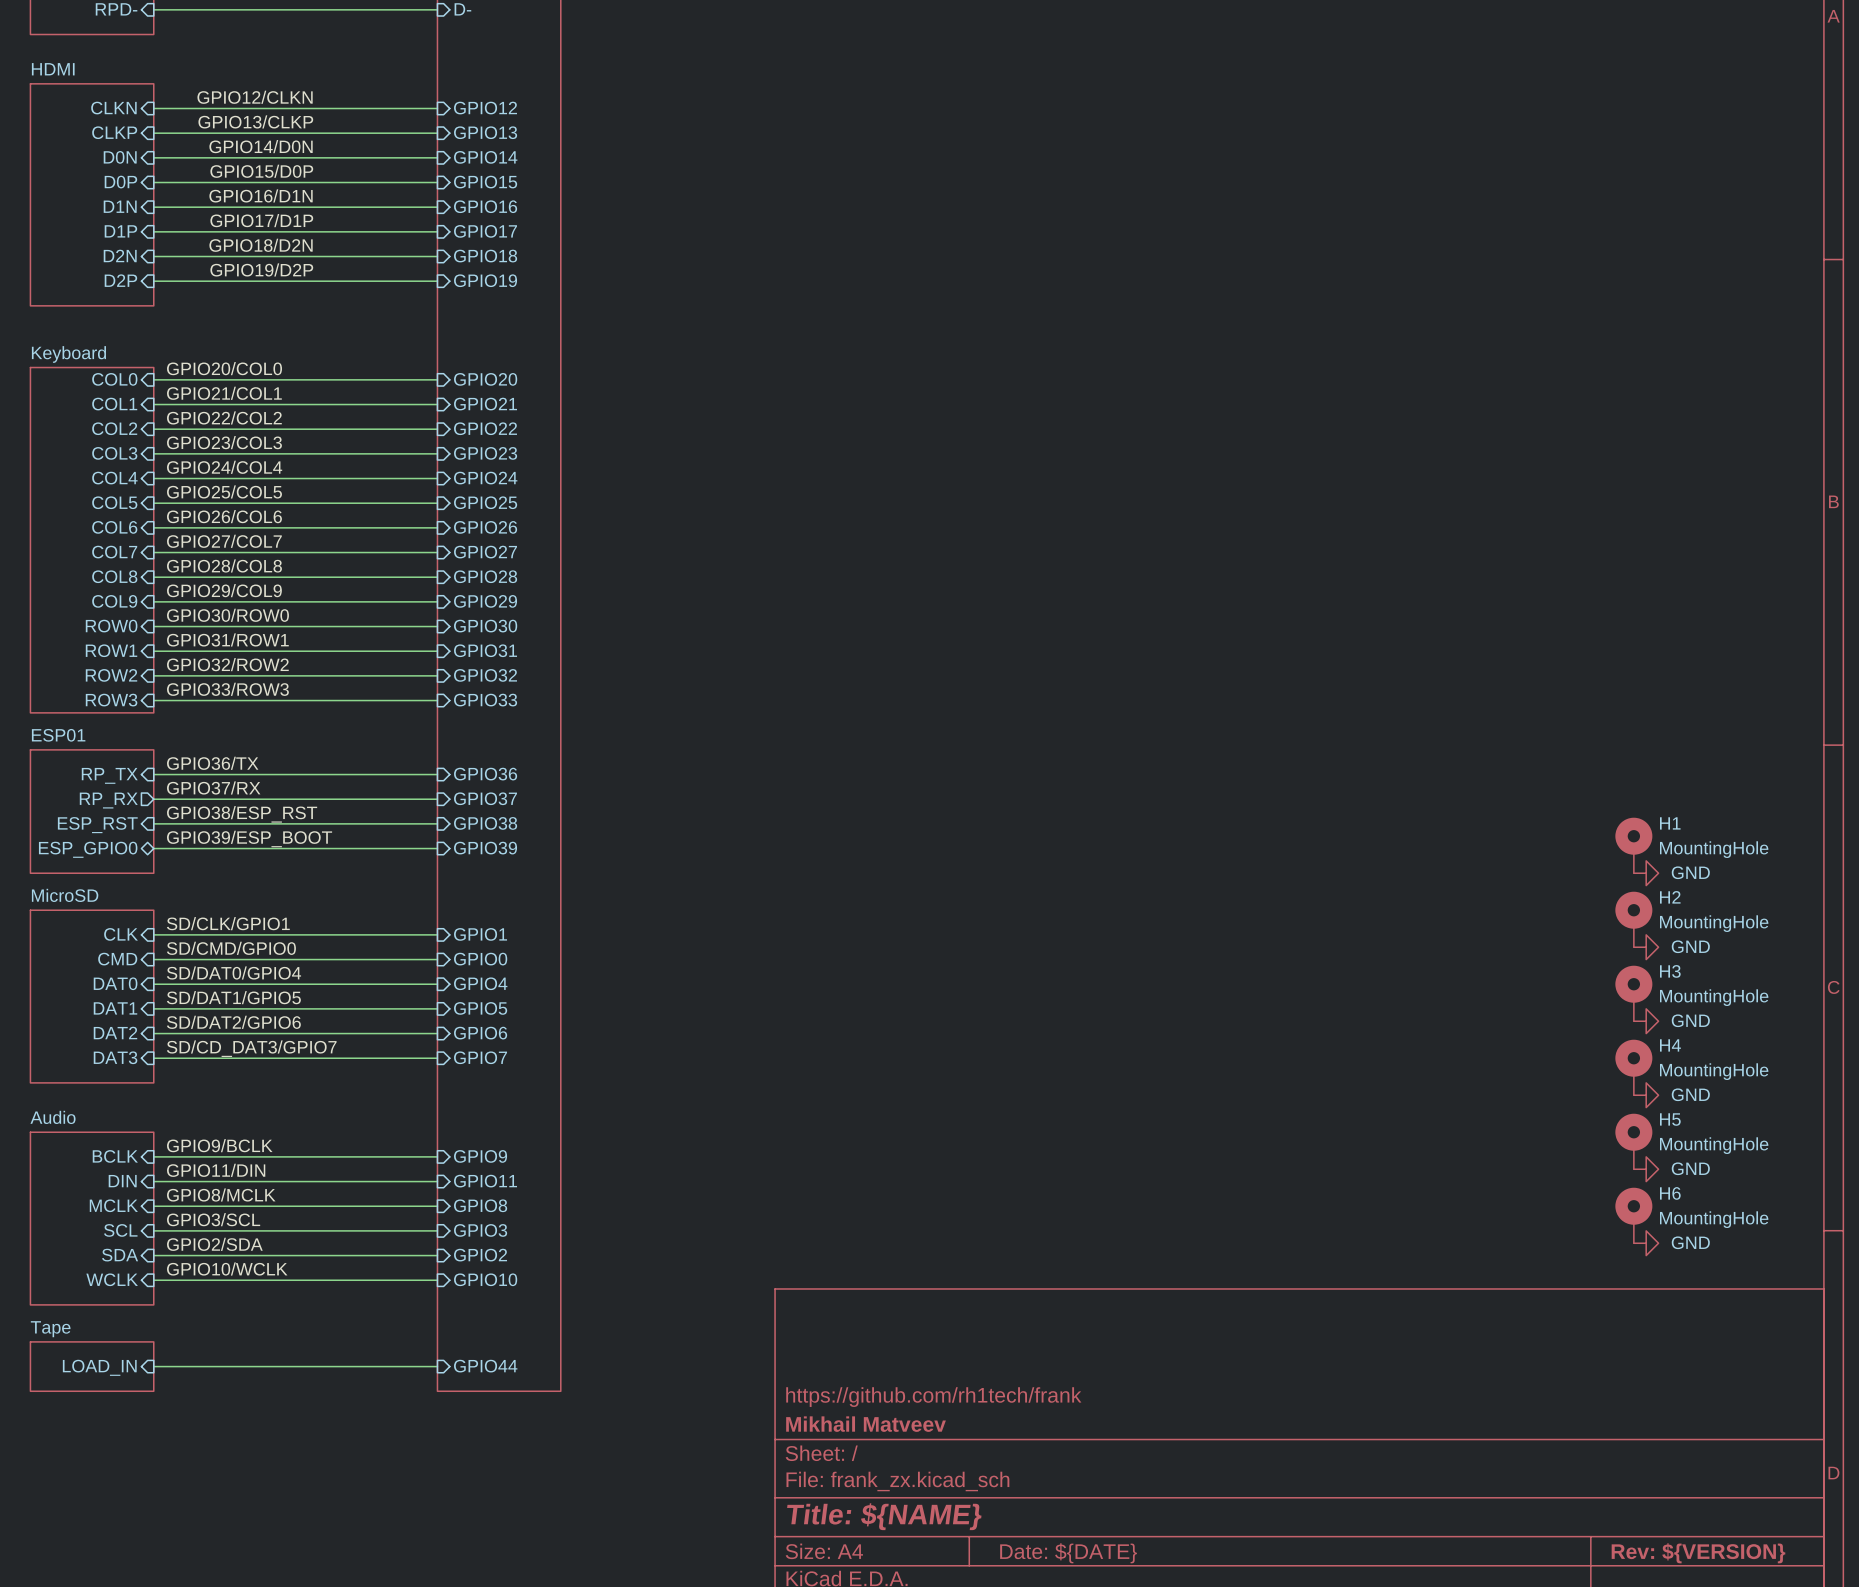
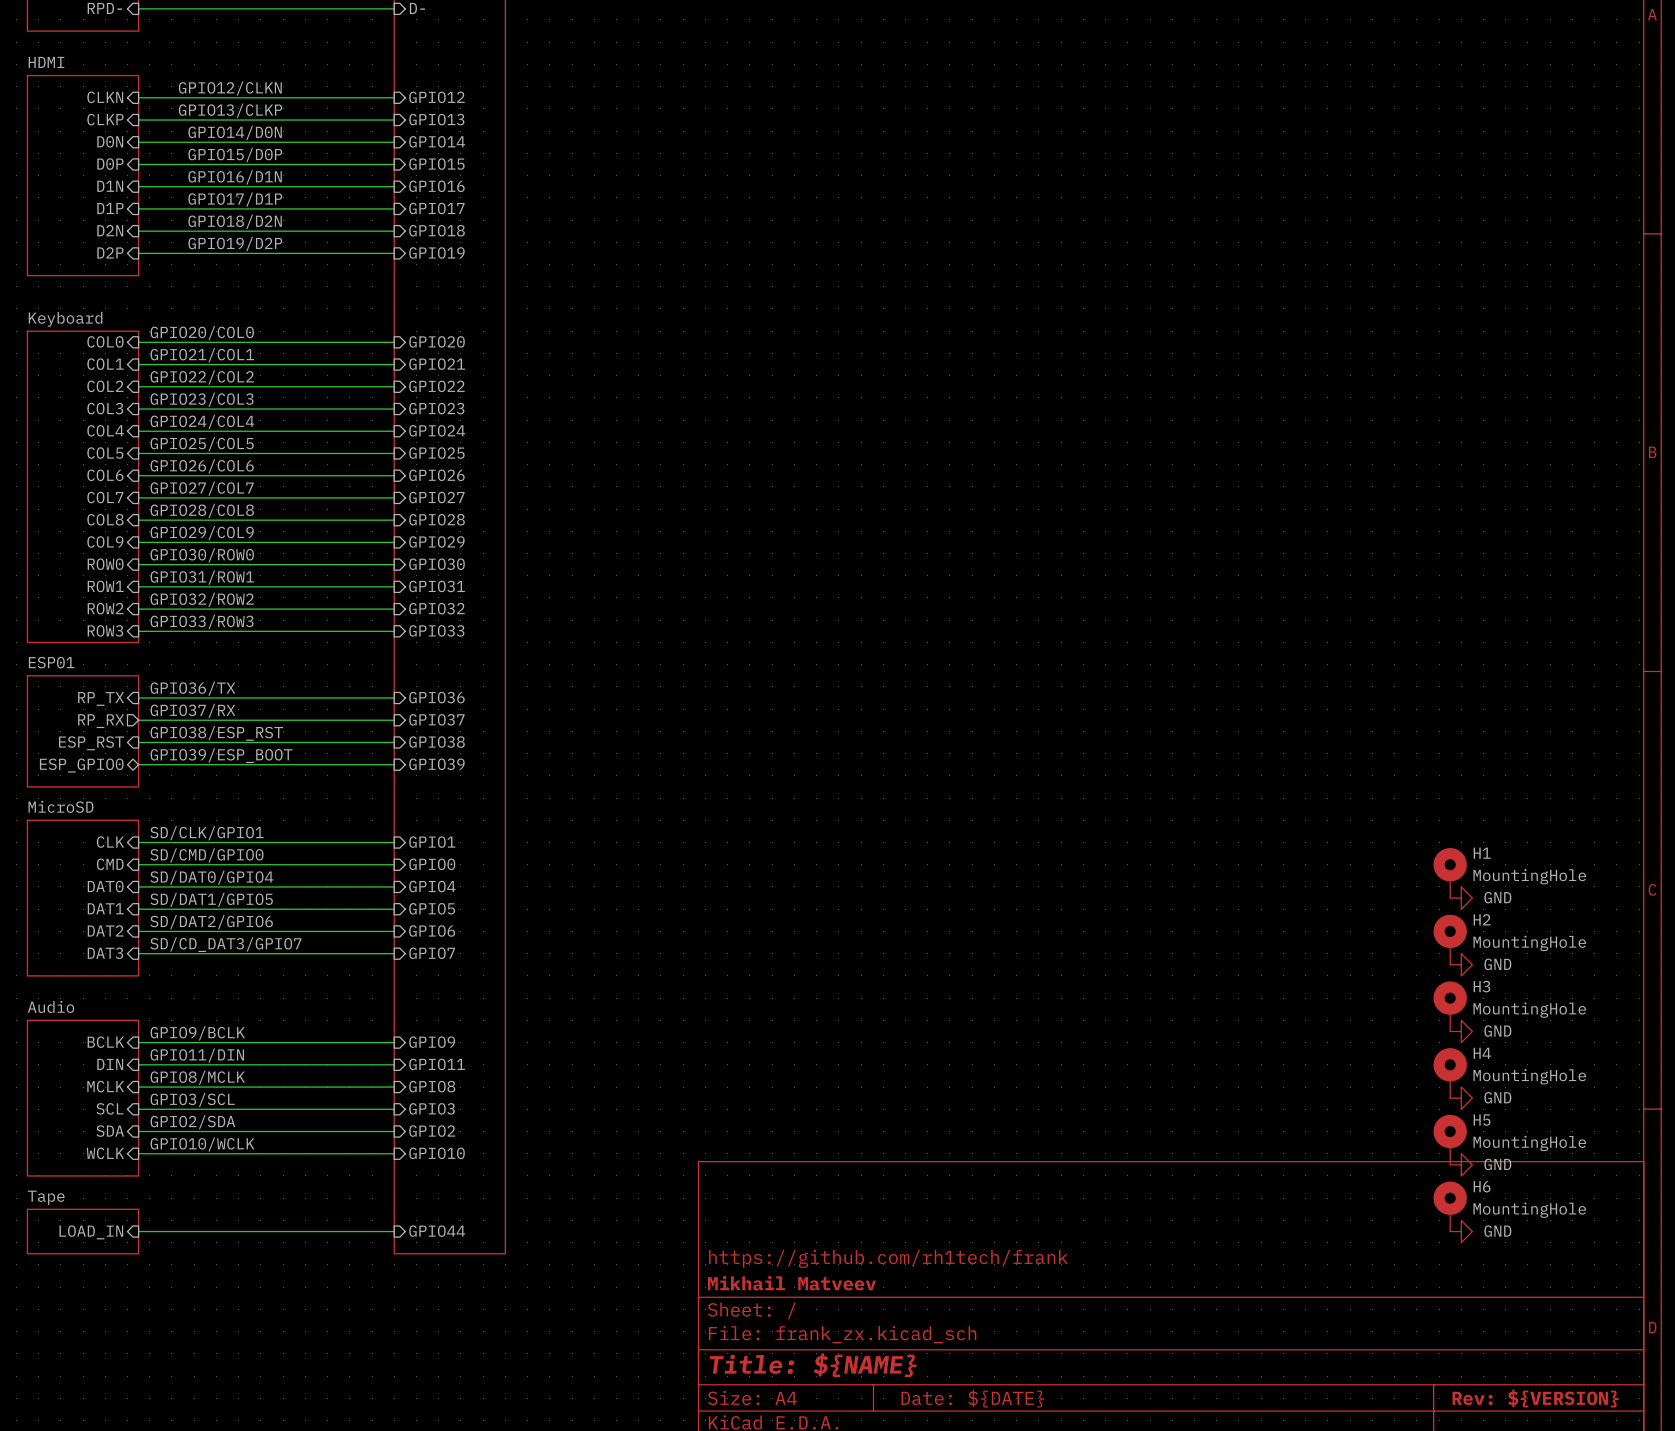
H1 position: (1633, 845) -> (1450, 873)
power symbol: GND (1646, 873) -> none
H2 position: (1633, 919) -> (1450, 939)
power symbol: GND (1646, 947) -> none
H3 position: (1633, 993) -> (1450, 1006)
power symbol: none -> GND (1461, 898)
power symbol: GND (1646, 1021) -> none
H4 position: (1633, 1067) -> (1450, 1073)
power symbol: none -> GND (1461, 964)
power symbol: GND (1646, 1095) -> none
H5 position: (1633, 1141) -> (1450, 1139)
power symbol: none -> GND (1461, 1031)
power symbol: GND (1646, 1169) -> none
H6 position: (1633, 1215) -> (1450, 1206)
power symbol: none -> GND (1461, 1098)
power symbol: GND (1646, 1243) -> none
power symbol: none -> GND (1461, 1164)
power symbol: none -> GND (1461, 1231)

